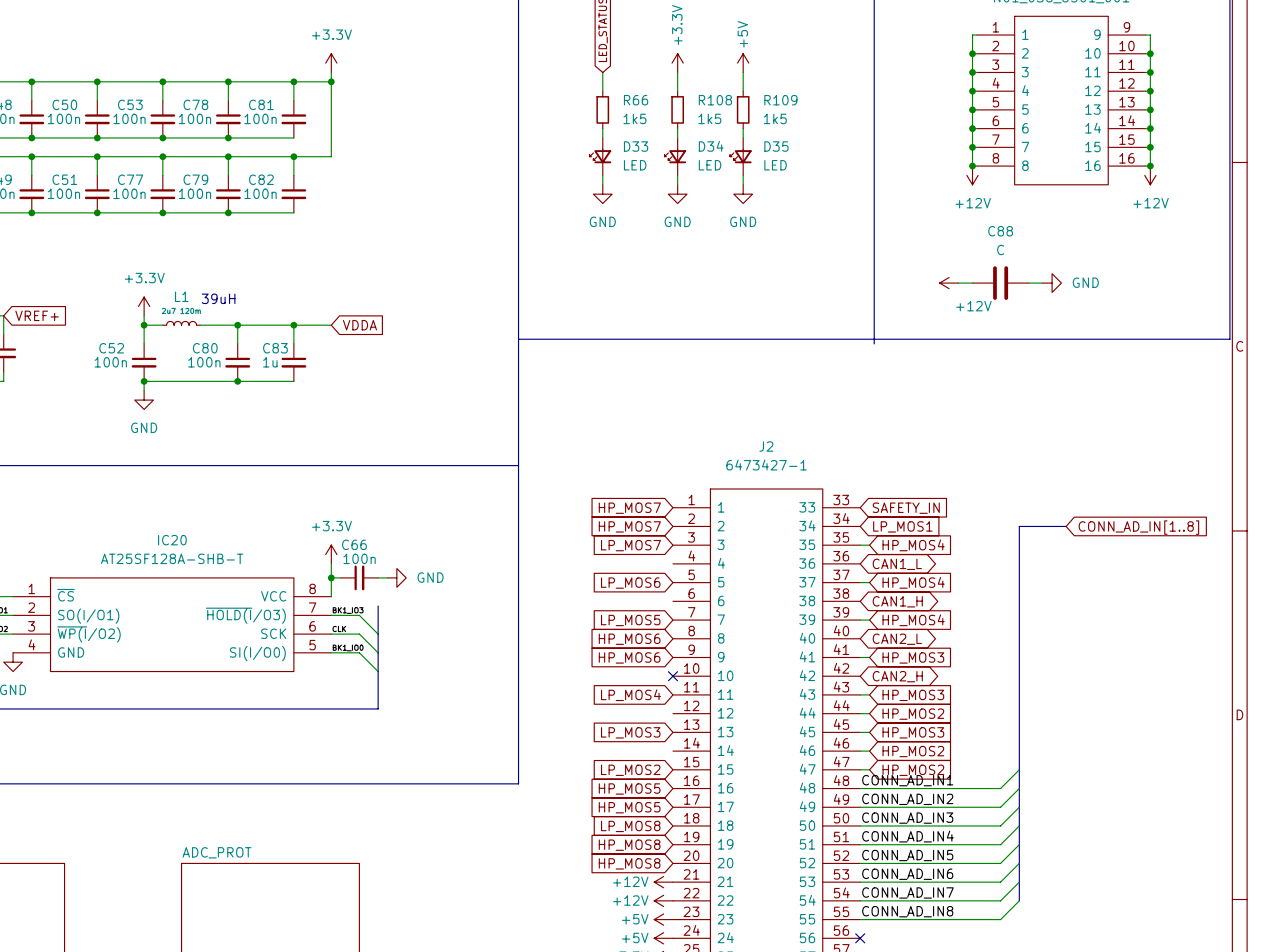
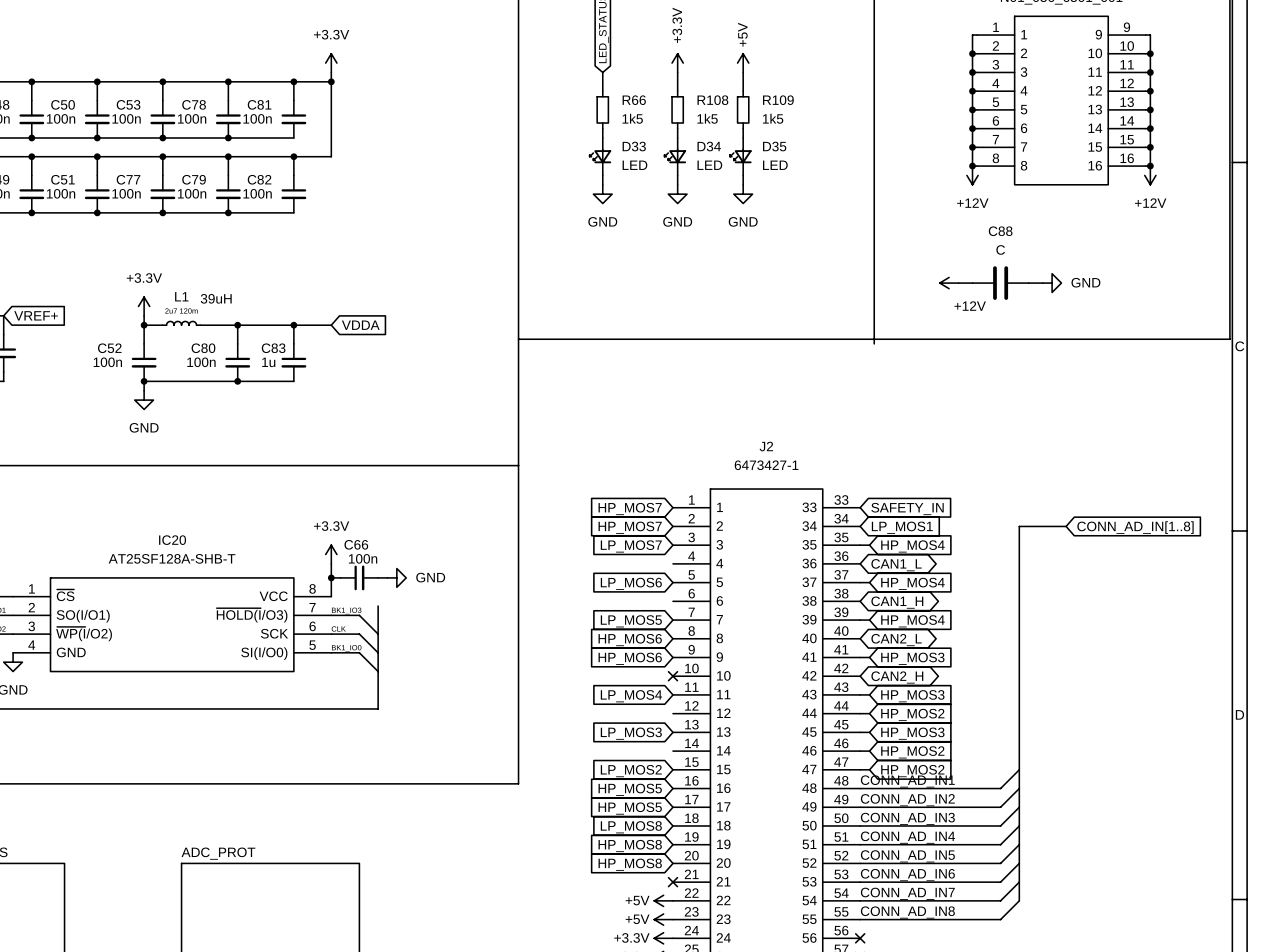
power symbol: +12V (663, 882) -> none
no-connect mark: none -> (672, 882)
power symbol: +12V (663, 900) -> +5V (663, 900)
power symbol: +5V (663, 938) -> +3.3V (663, 938)

